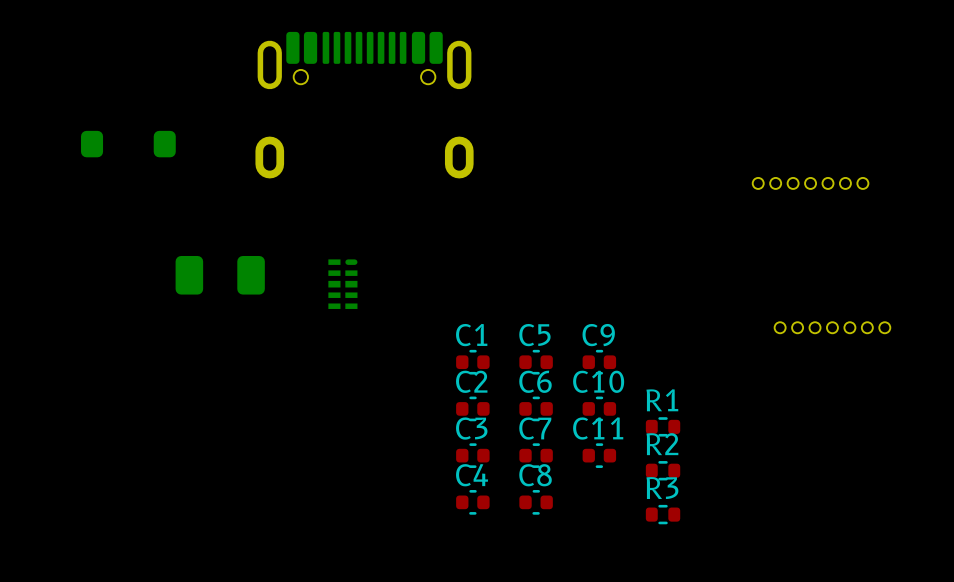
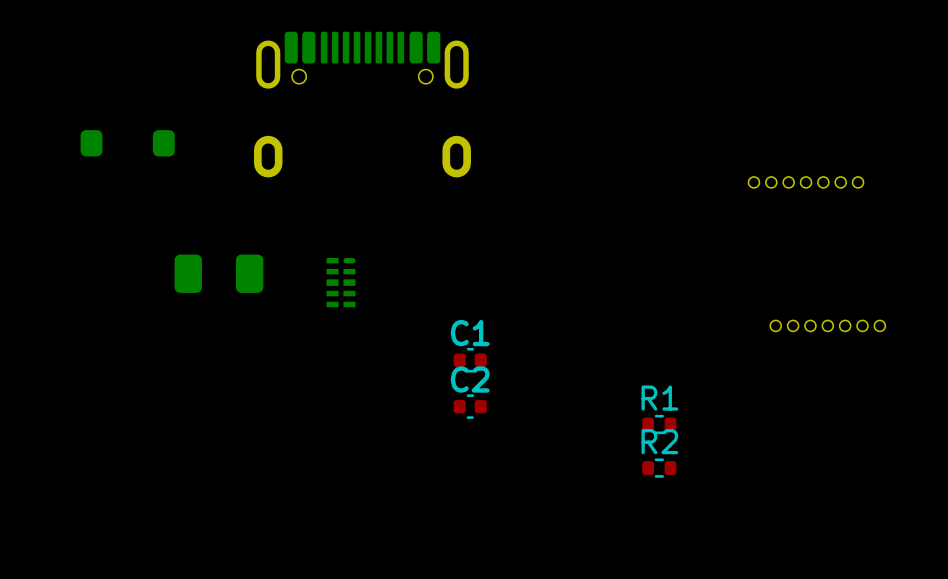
C5: (536, 362) -> none
C9: (599, 362) -> none
C6: (536, 408) -> none
C10: (599, 408) -> none
C3: (472, 455) -> none
C7: (536, 455) -> none
C11: (599, 455) -> none
C4: (472, 502) -> none
C8: (536, 502) -> none
R3: (663, 514) -> none

